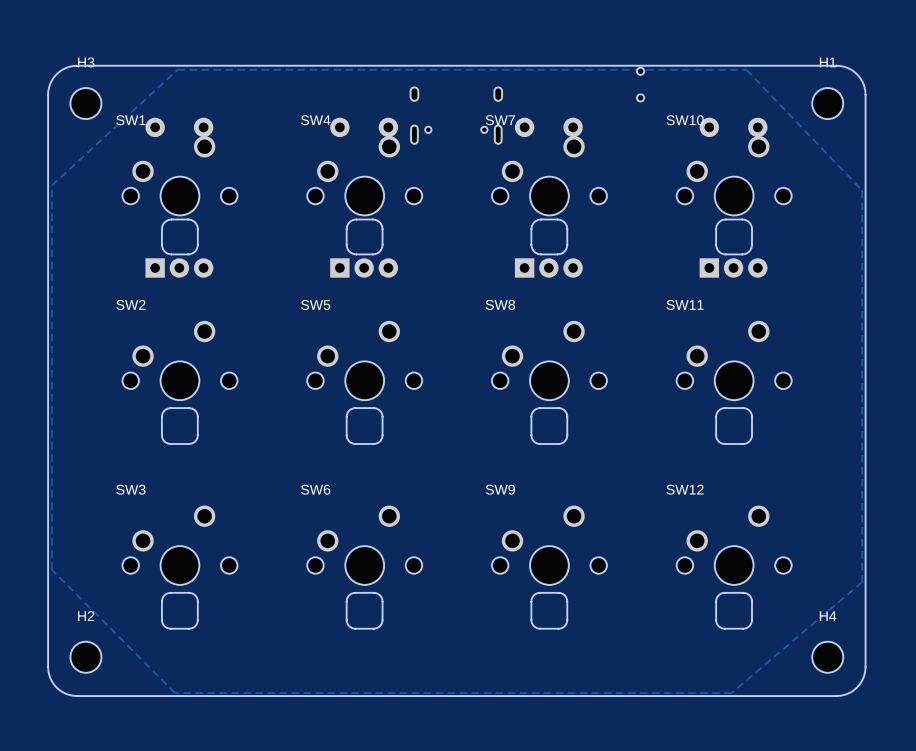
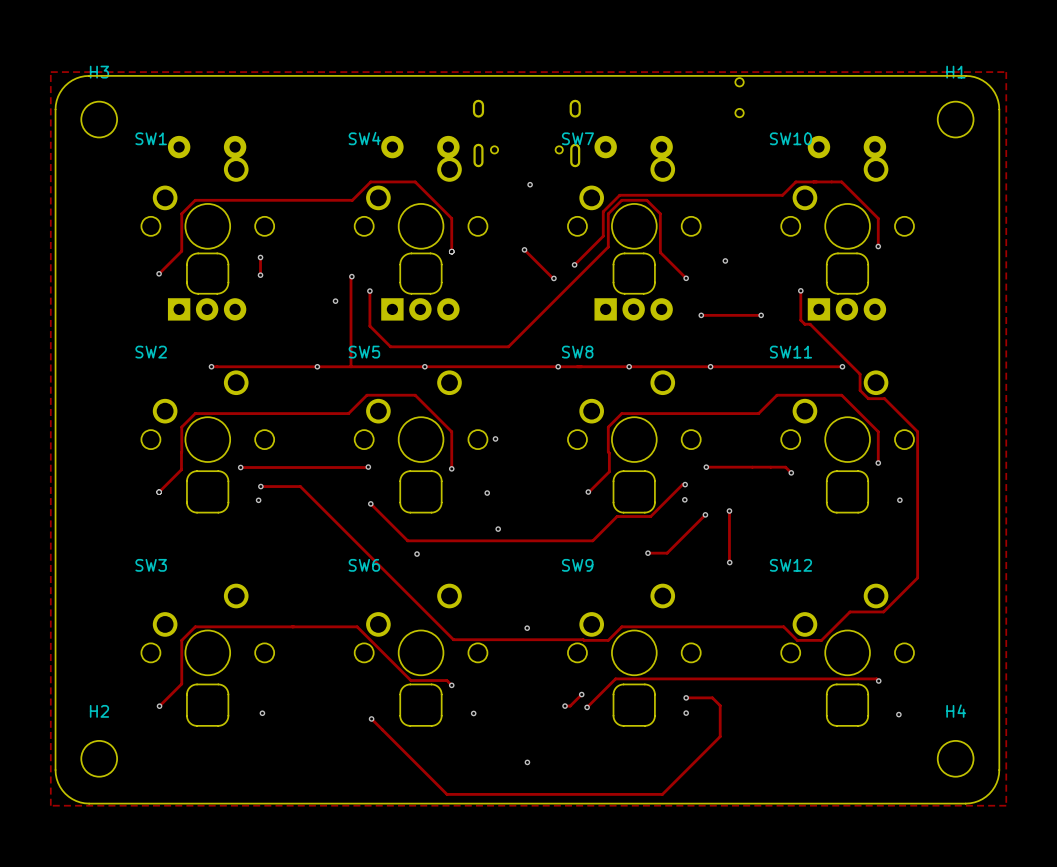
zone outline: (177, 69) (51, 185) (51, 569) (175, 692) (731, 692) (862, 582) (862, 190) (746, 69) (177, 69) -> (50, 72) (50, 805) (1006, 805) (1006, 72) (50, 72)
via: none -> (530, 184)
track: none -> (878, 246) (878, 218) (841, 181) (795, 181) (782, 195) (619, 195) (603, 211) (603, 236) (574, 264)
via: none -> (878, 246)
track: none -> (524, 249) (553, 278)
via: none -> (524, 249)
track: none -> (451, 251) (451, 218) (415, 181) (370, 181) (352, 200) (195, 200) (181, 213) (181, 251) (159, 273)
via: none -> (451, 251)
track: none -> (260, 257) (260, 275)
via: none -> (260, 257)
via: none -> (725, 260)
via: none -> (574, 264)
via: none -> (159, 273)
via: none -> (260, 275)
track: none -> (351, 276) (351, 366)
via: none -> (351, 276)
via: none -> (553, 278)
track: none -> (686, 278) (660, 252) (660, 213) (646, 200) (621, 200) (608, 213) (608, 247) (508, 346) (390, 346) (369, 326) (369, 291)
via: none -> (686, 278)
track: none -> (800, 290) (800, 320) (804, 324) (810, 324) (860, 374) (860, 390) (868, 398) (884, 398) (917, 431) (917, 577) (883, 611) (850, 611) (821, 640) (797, 640) (783, 626) (621, 626) (608, 640) (453, 639) (300, 486) (260, 486)
via: none -> (800, 290)
via: none -> (369, 291)
via: none -> (335, 301)
track: none -> (701, 315) (761, 315)
via: none -> (701, 315)
via: none -> (761, 315)
track: none -> (211, 366) (842, 366)
via: none -> (211, 366)
via: none -> (317, 366)
via: none -> (424, 366)
via: none -> (558, 366)
via: none -> (629, 366)
via: none -> (710, 366)
via: none -> (842, 366)
via: none -> (495, 438)
track: none -> (878, 463) (878, 431) (841, 395) (776, 395) (758, 413) (621, 413) (608, 427) (609, 471) (588, 492)
via: none -> (878, 463)
via: none -> (240, 467)
track: none -> (368, 467) (240, 467)
via: none -> (368, 467)
track: none -> (706, 467) (785, 467) (791, 472)
via: none -> (706, 467)
track: none -> (451, 468) (451, 431) (415, 395) (366, 395) (348, 413) (195, 413) (181, 427) (181, 469) (159, 492)
via: none -> (451, 468)
via: none -> (791, 472)
track: none -> (685, 484) (682, 484) (650, 516) (617, 516) (592, 540) (407, 540) (370, 503)
via: none -> (685, 484)
via: none -> (260, 486)
via: none -> (159, 492)
via: none -> (588, 492)
via: none -> (487, 493)
via: none -> (684, 499)
via: none -> (258, 500)
via: none -> (899, 500)
via: none -> (370, 503)
track: none -> (729, 511) (729, 562)
via: none -> (729, 511)
track: none -> (705, 514) (667, 553) (647, 553)
via: none -> (705, 514)
via: none -> (498, 529)
via: none -> (417, 554)
via: none -> (647, 553)
via: none -> (729, 562)
via: none -> (527, 628)
track: none -> (878, 681) (876, 678) (615, 678) (587, 707)
via: none -> (878, 681)
track: none -> (451, 685) (446, 680) (410, 680) (357, 626) (195, 626) (181, 640) (181, 683) (159, 706)
via: none -> (451, 685)
track: none -> (581, 694) (570, 706) (565, 706)
via: none -> (581, 694)
track: none -> (686, 697) (712, 697) (720, 705) (720, 736) (662, 794) (447, 794) (371, 718)
via: none -> (686, 697)
via: none -> (159, 706)
via: none -> (565, 706)
via: none -> (587, 707)
via: none -> (262, 713)
via: none -> (473, 713)
via: none -> (686, 713)
via: none -> (898, 714)
via: none -> (371, 718)
via: none -> (527, 762)

